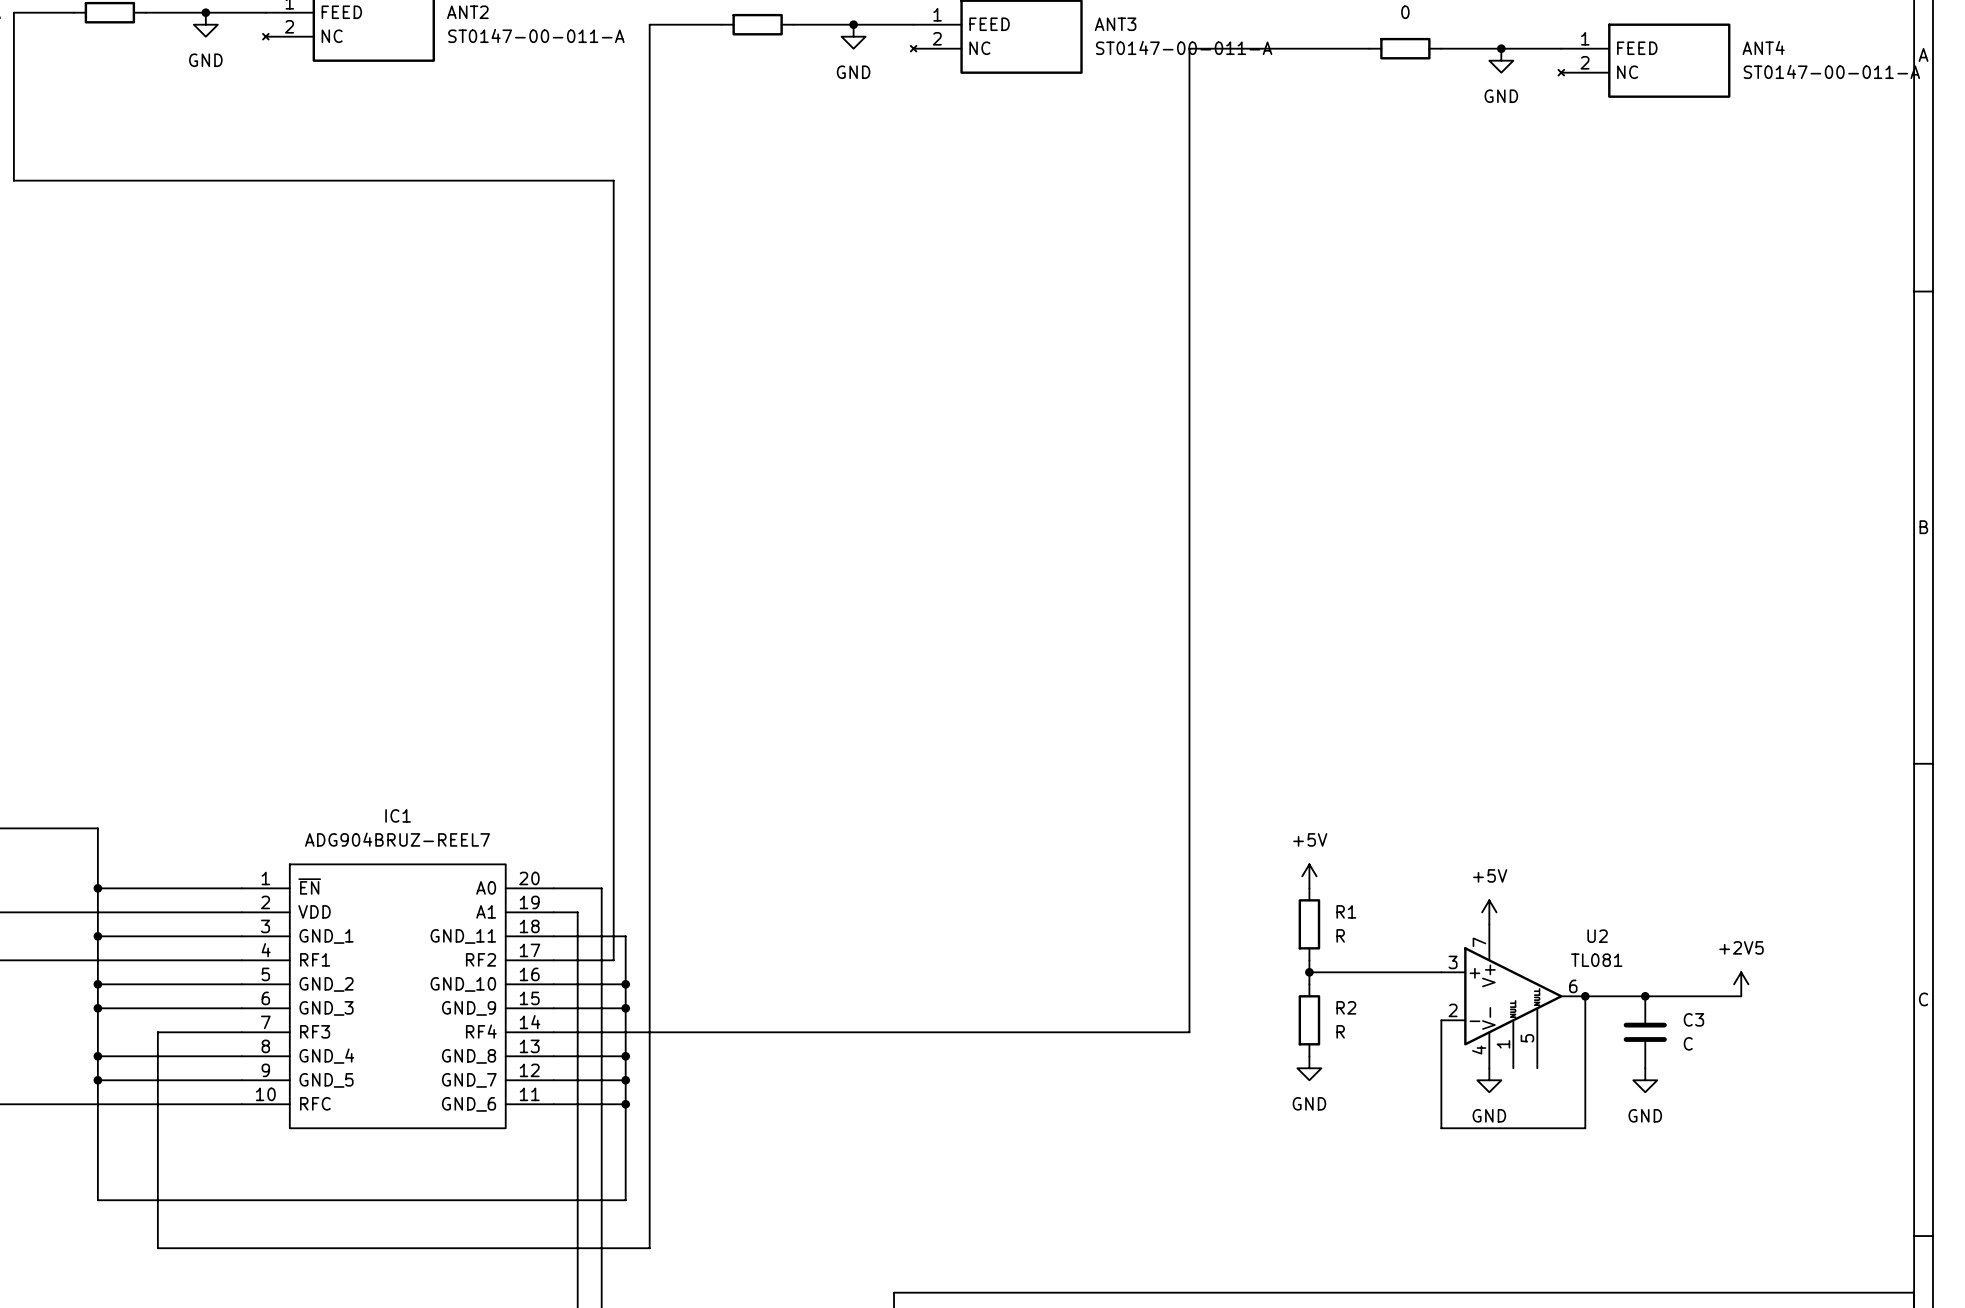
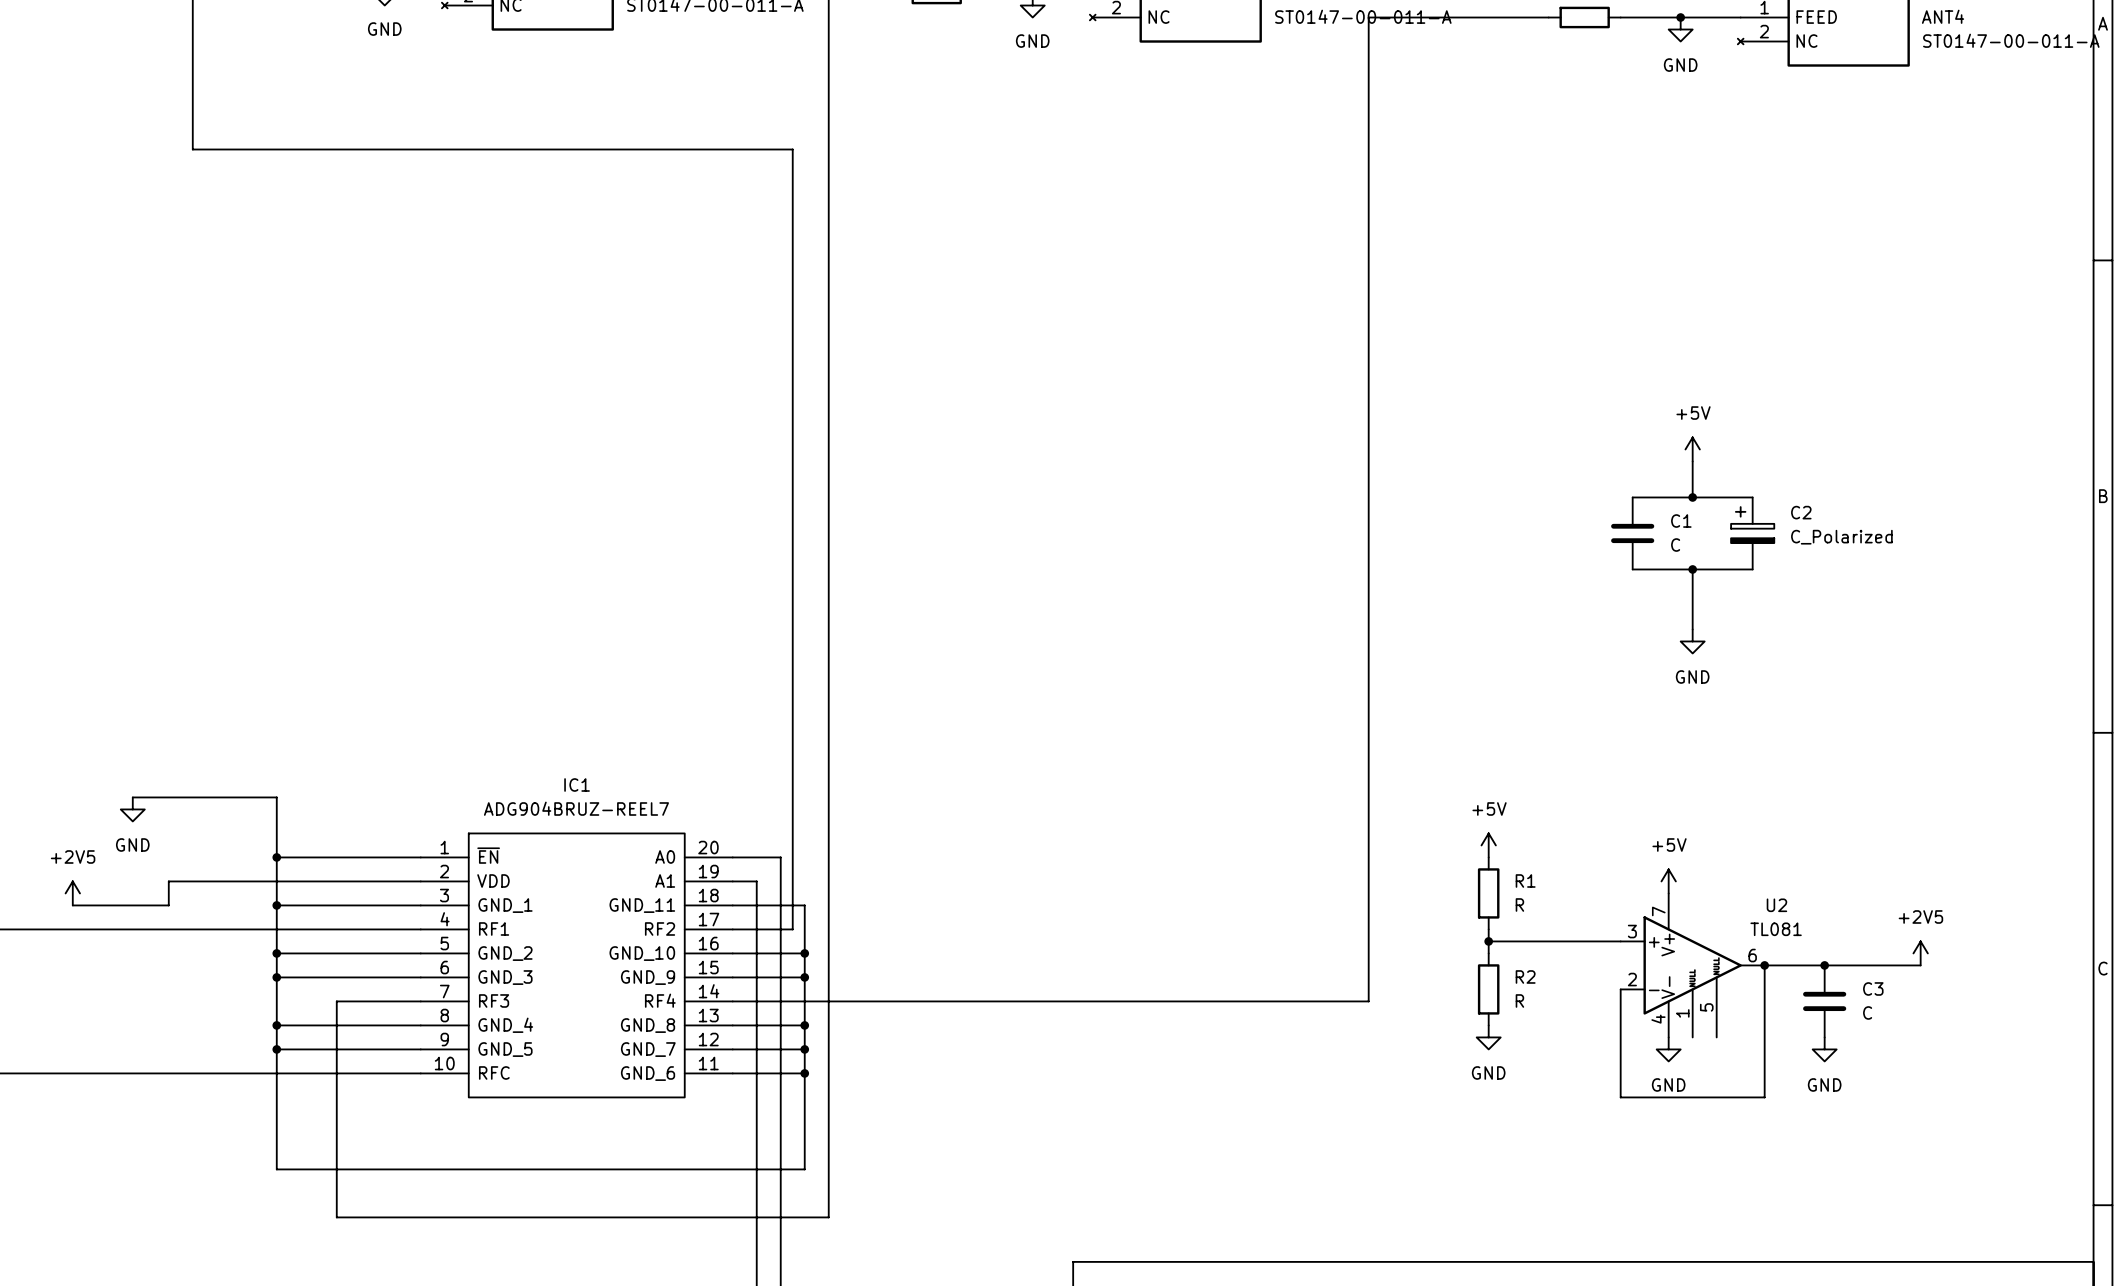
power symbol: none -> +5V (1692, 449)
wire: none -> (1692, 461) (1692, 497)
wire: none -> (1632, 497) (1752, 497)
junction: none -> (1692, 497)
C1: none -> C (1632, 533)
C2: none -> C_Polarized (1752, 533)
wire: none -> (1632, 569) (1752, 569)
wire: none -> (1692, 569) (1692, 629)
junction: none -> (1692, 569)
power symbol: none -> GND (1692, 641)

